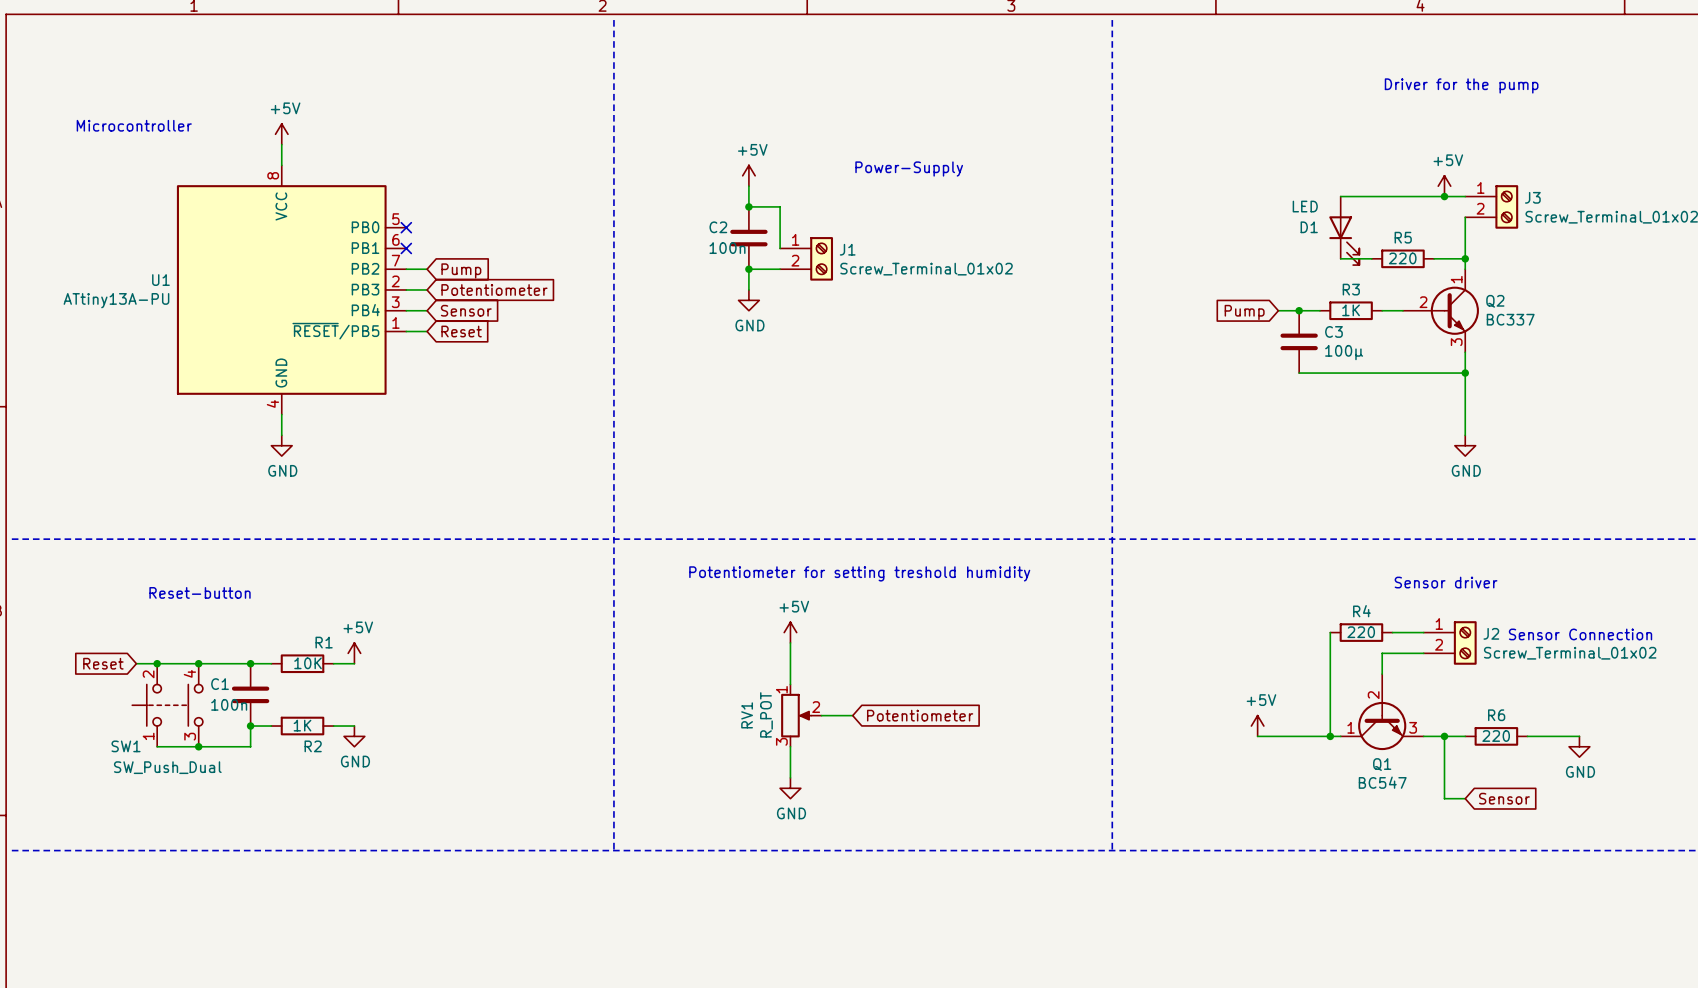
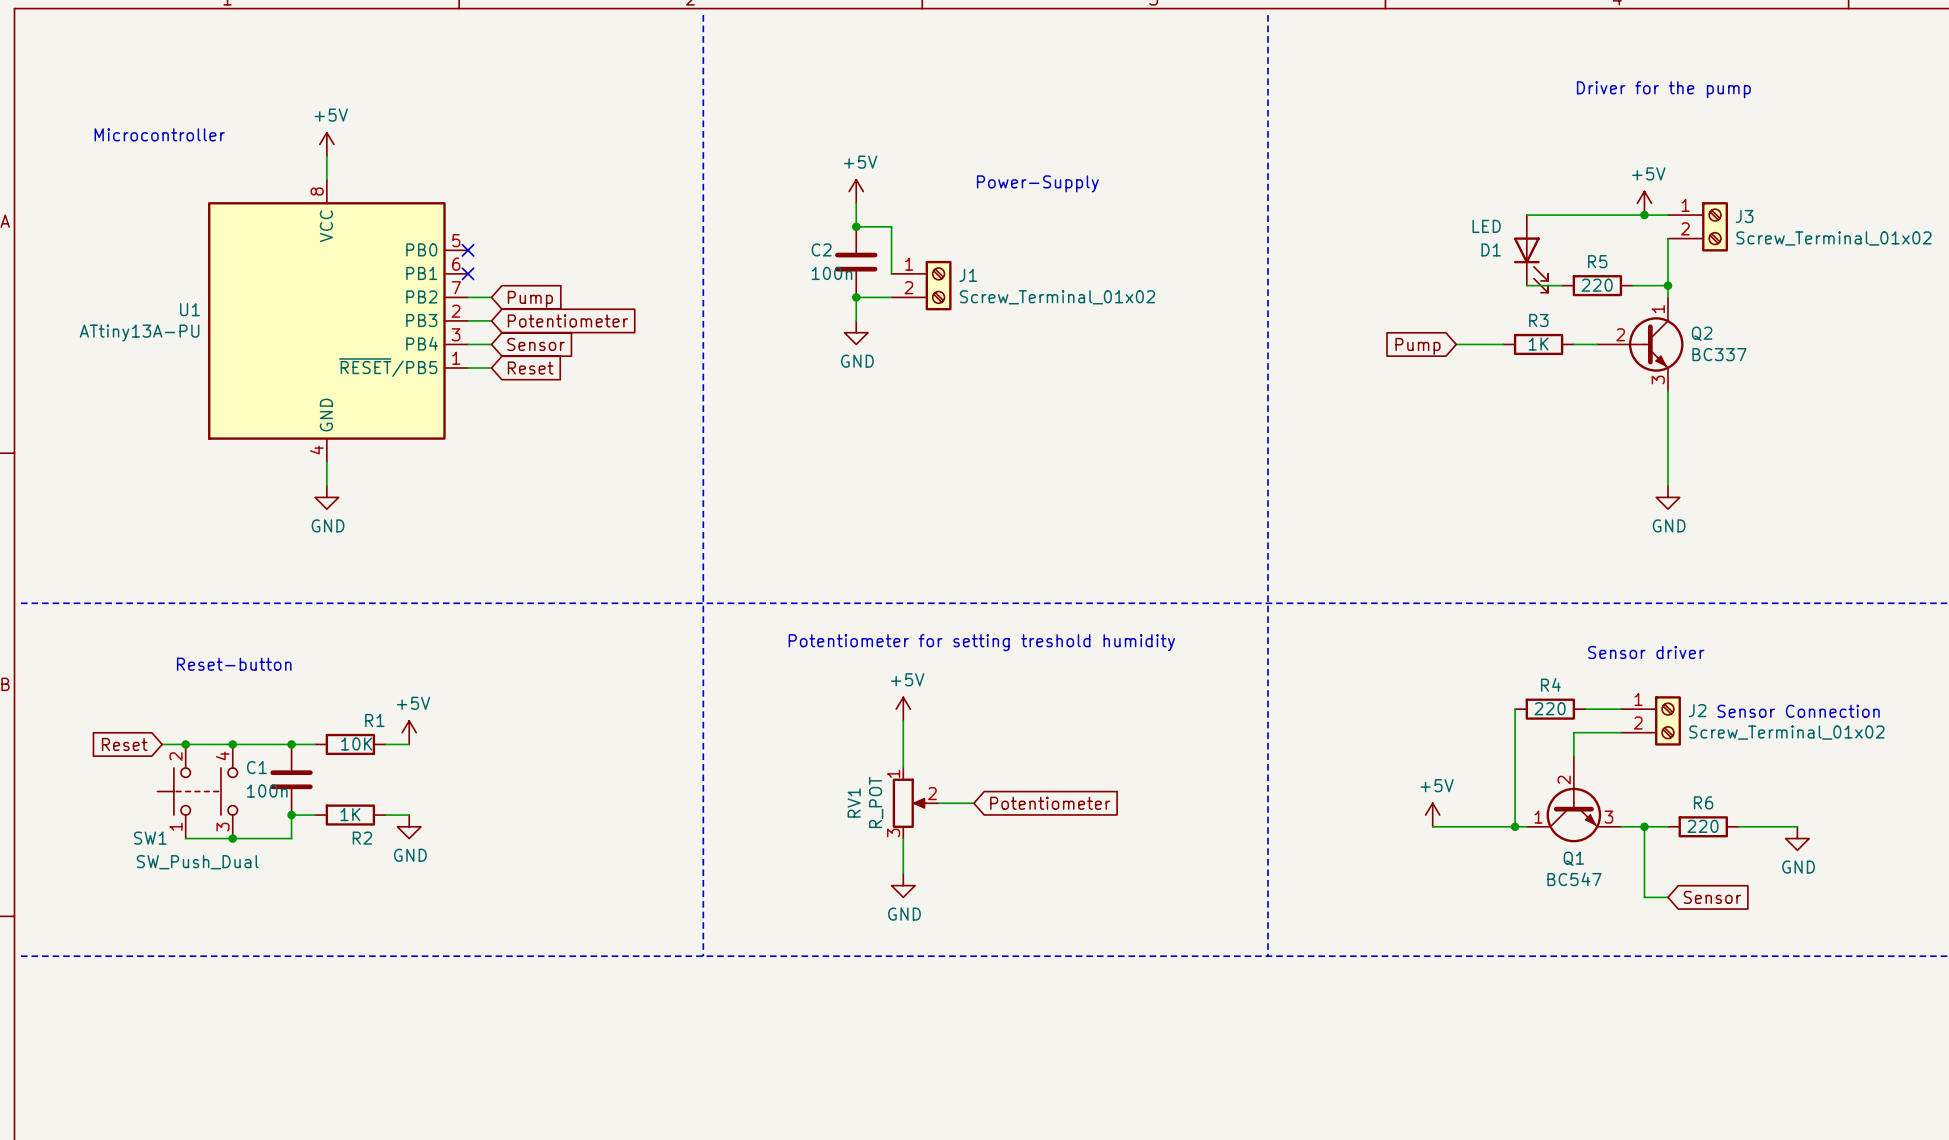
junction: (1299, 310) -> none
C3: 100µ (1299, 341) -> none
wire: (1299, 373) (1465, 373) -> none
junction: (1465, 373) -> none

